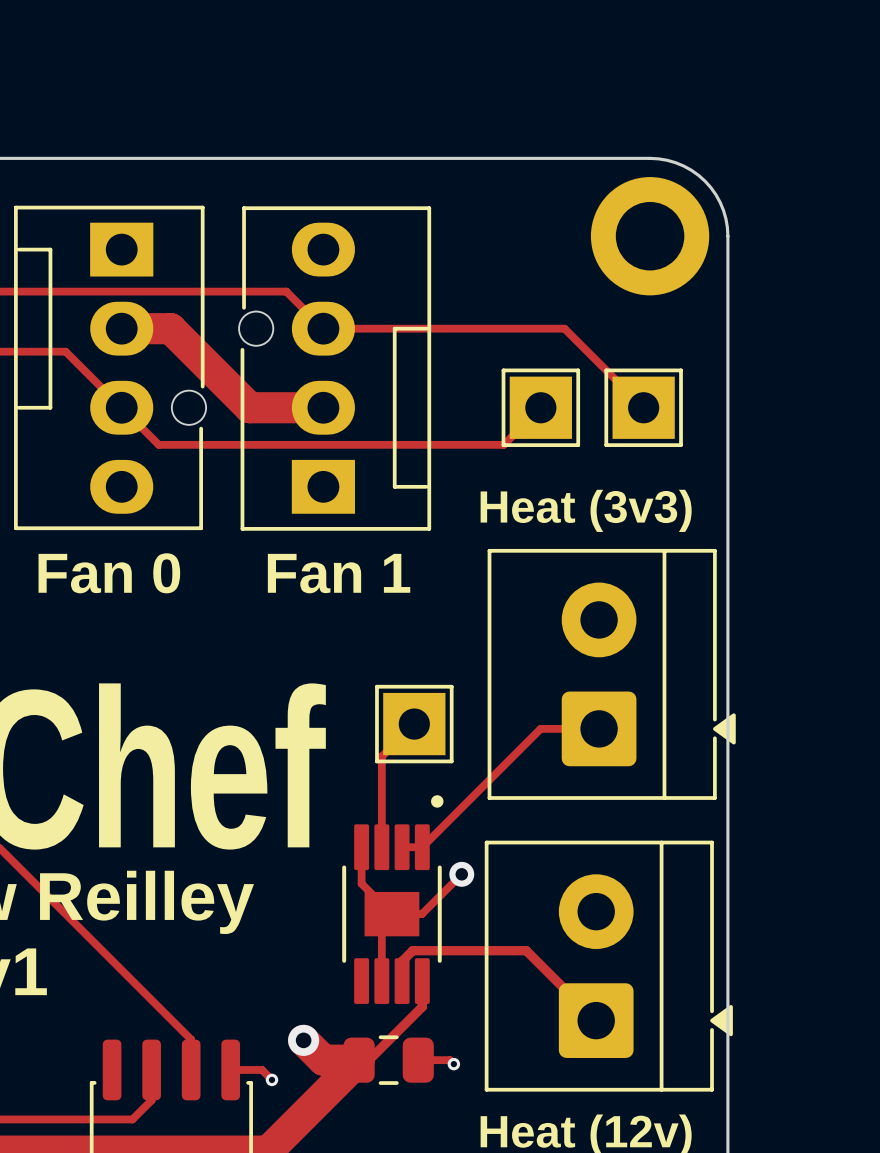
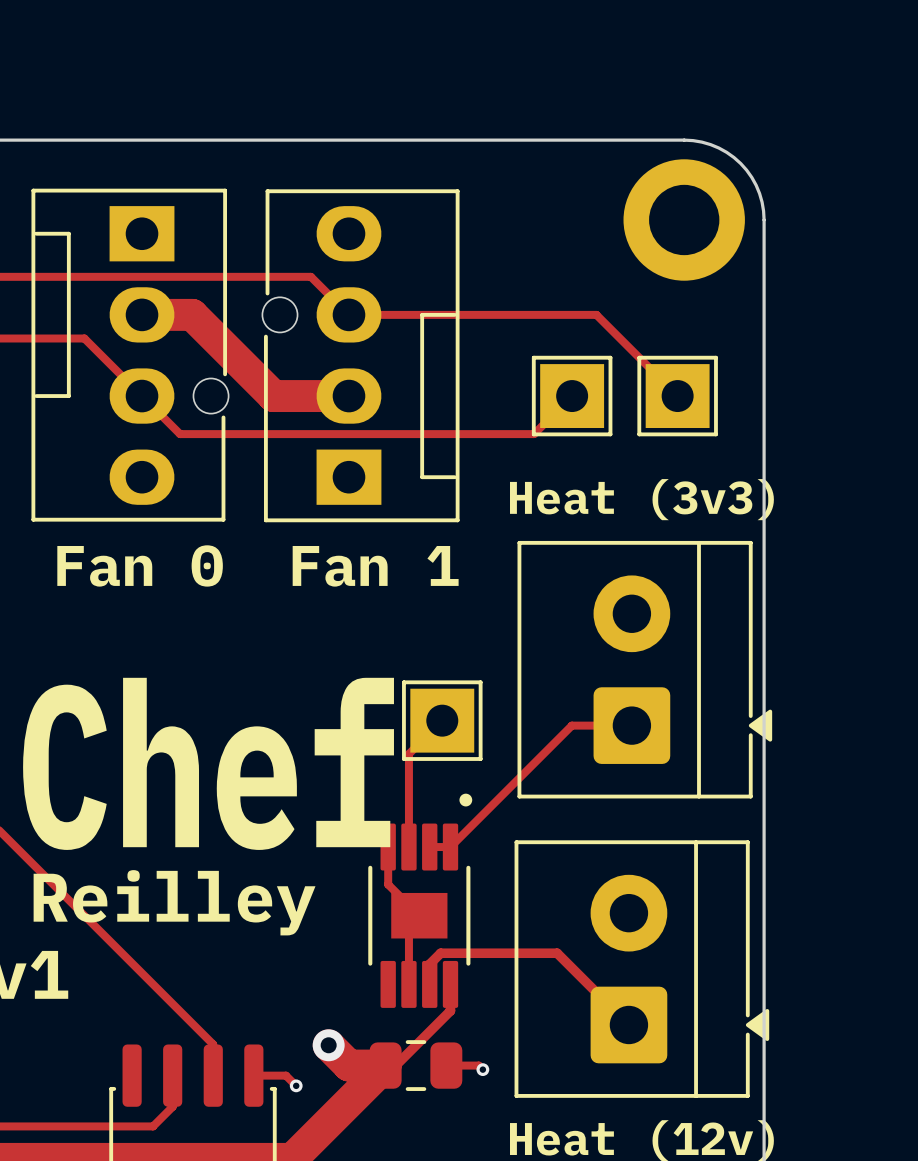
track: (461, 874) (421, 914) (391, 914) -> none
via: (461, 874) -> none

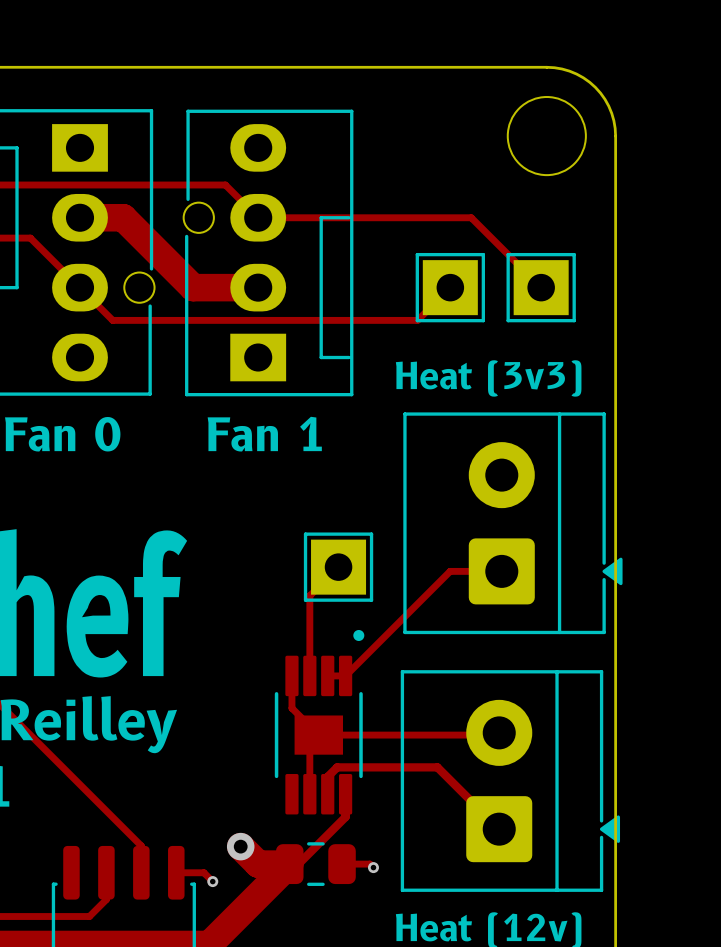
round board edge: none -> [507, 96, 587, 176]
part: (684, 219) -> none
track: none -> (318, 735) (497, 735)

